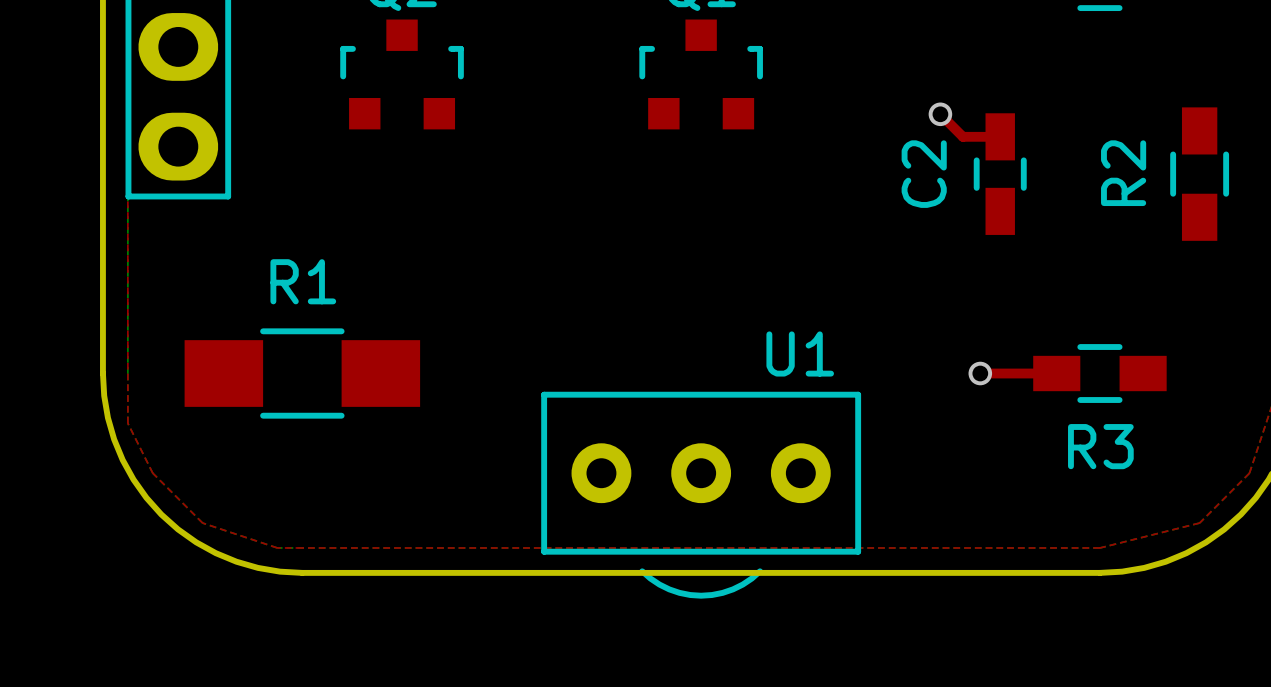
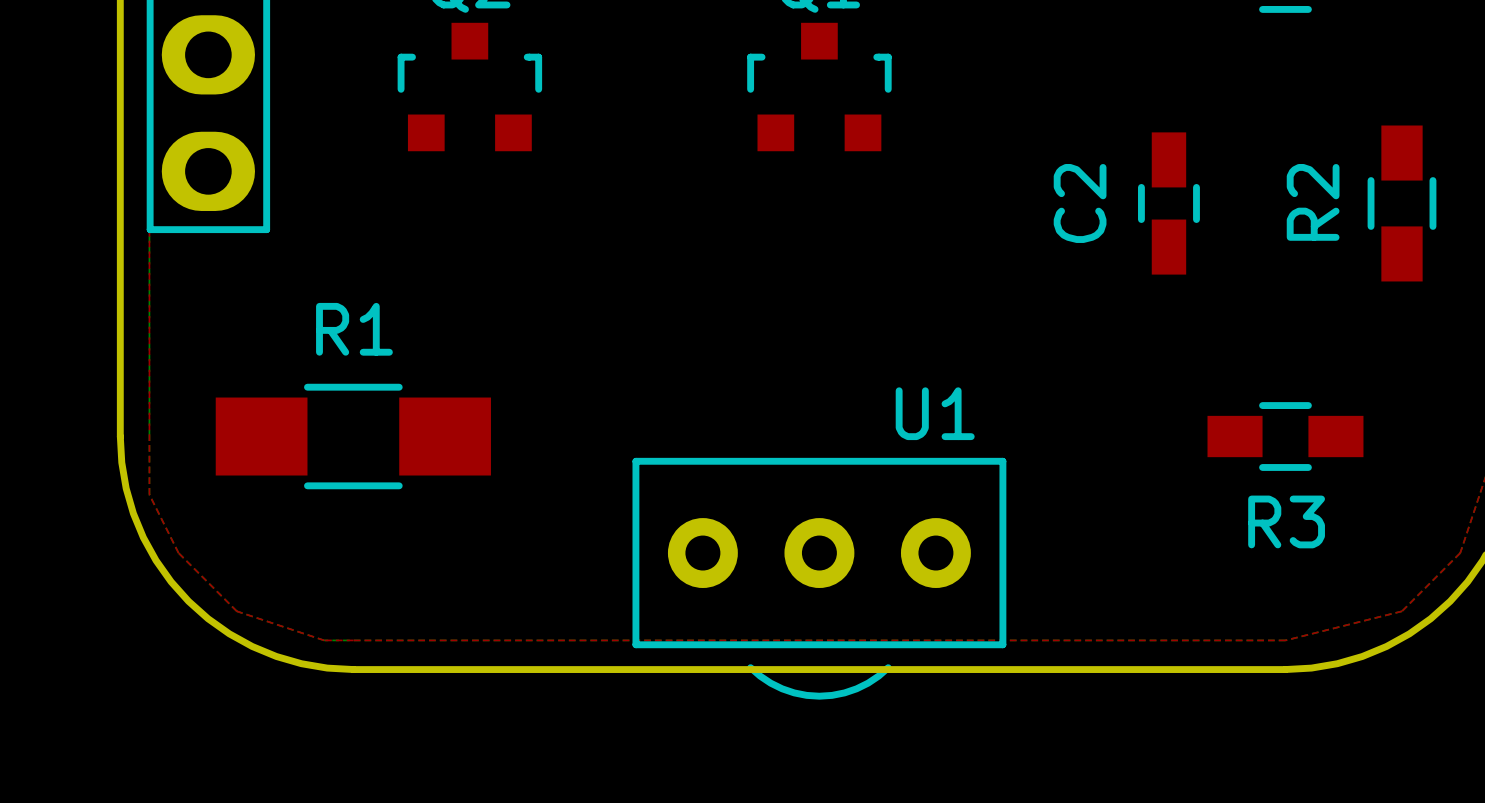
top track: (940, 114) (962, 136) (1000, 136) -> none
via: (940, 114) -> none
top track: (980, 373) (1056, 373) -> none
via: (980, 373) -> none

